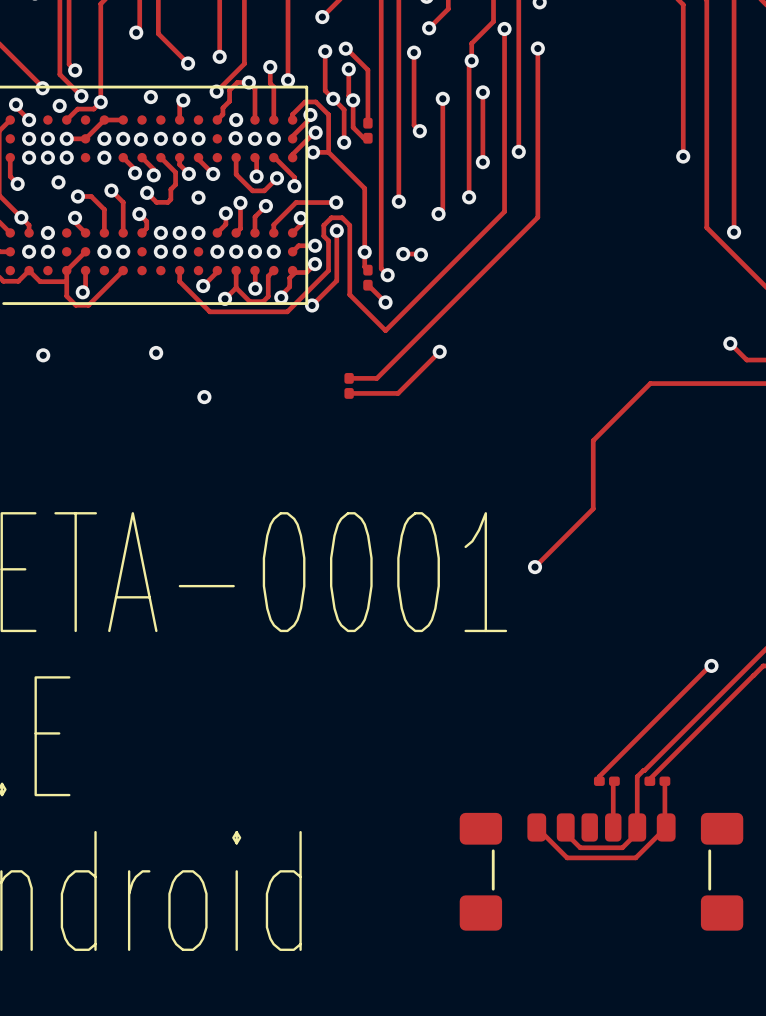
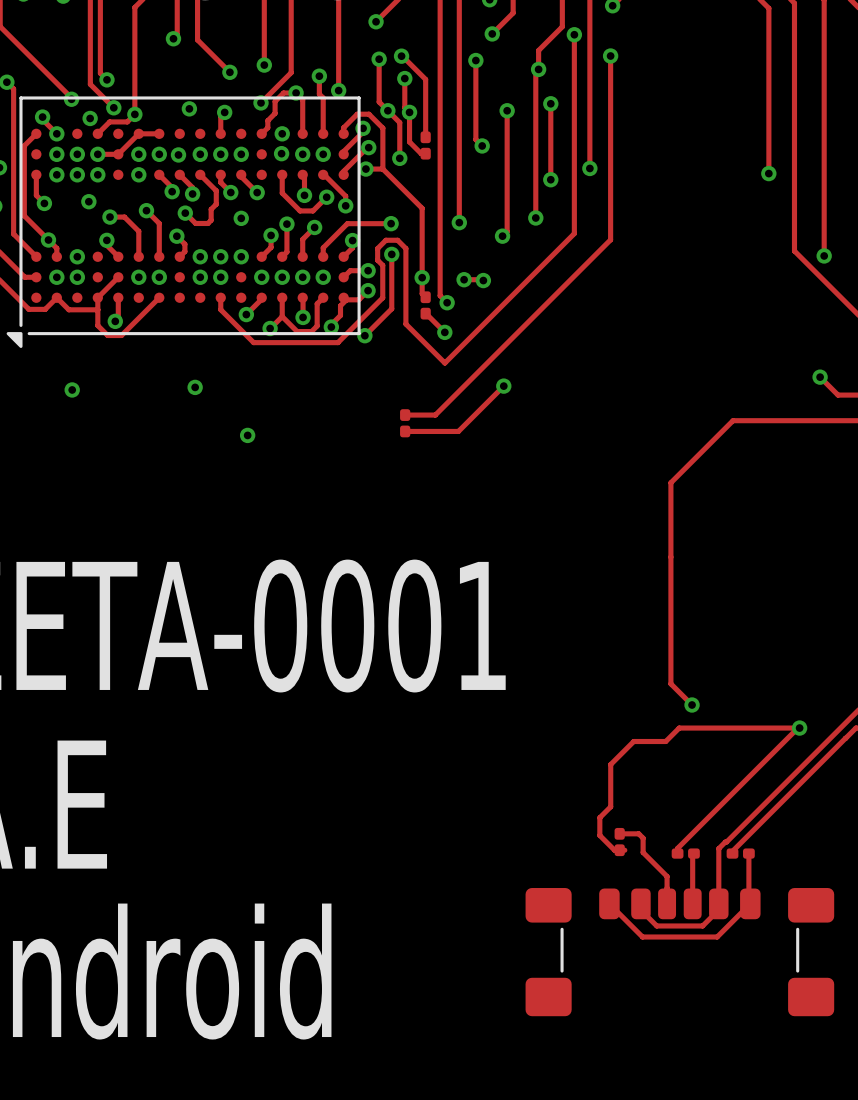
track: (593, 508) (535, 567) -> (670, 557) (670, 683) (692, 705)
via position: (535, 567) -> (692, 705)
track: none -> (797, 728) (679, 728) (665, 741) (633, 741) (610, 764) (610, 806) (599, 817) (599, 835) (614, 850) (624, 850)
track: none -> (619, 833) (638, 833) (643, 838) (643, 852) (667, 876) (667, 903)
part: none -> (619, 842)

